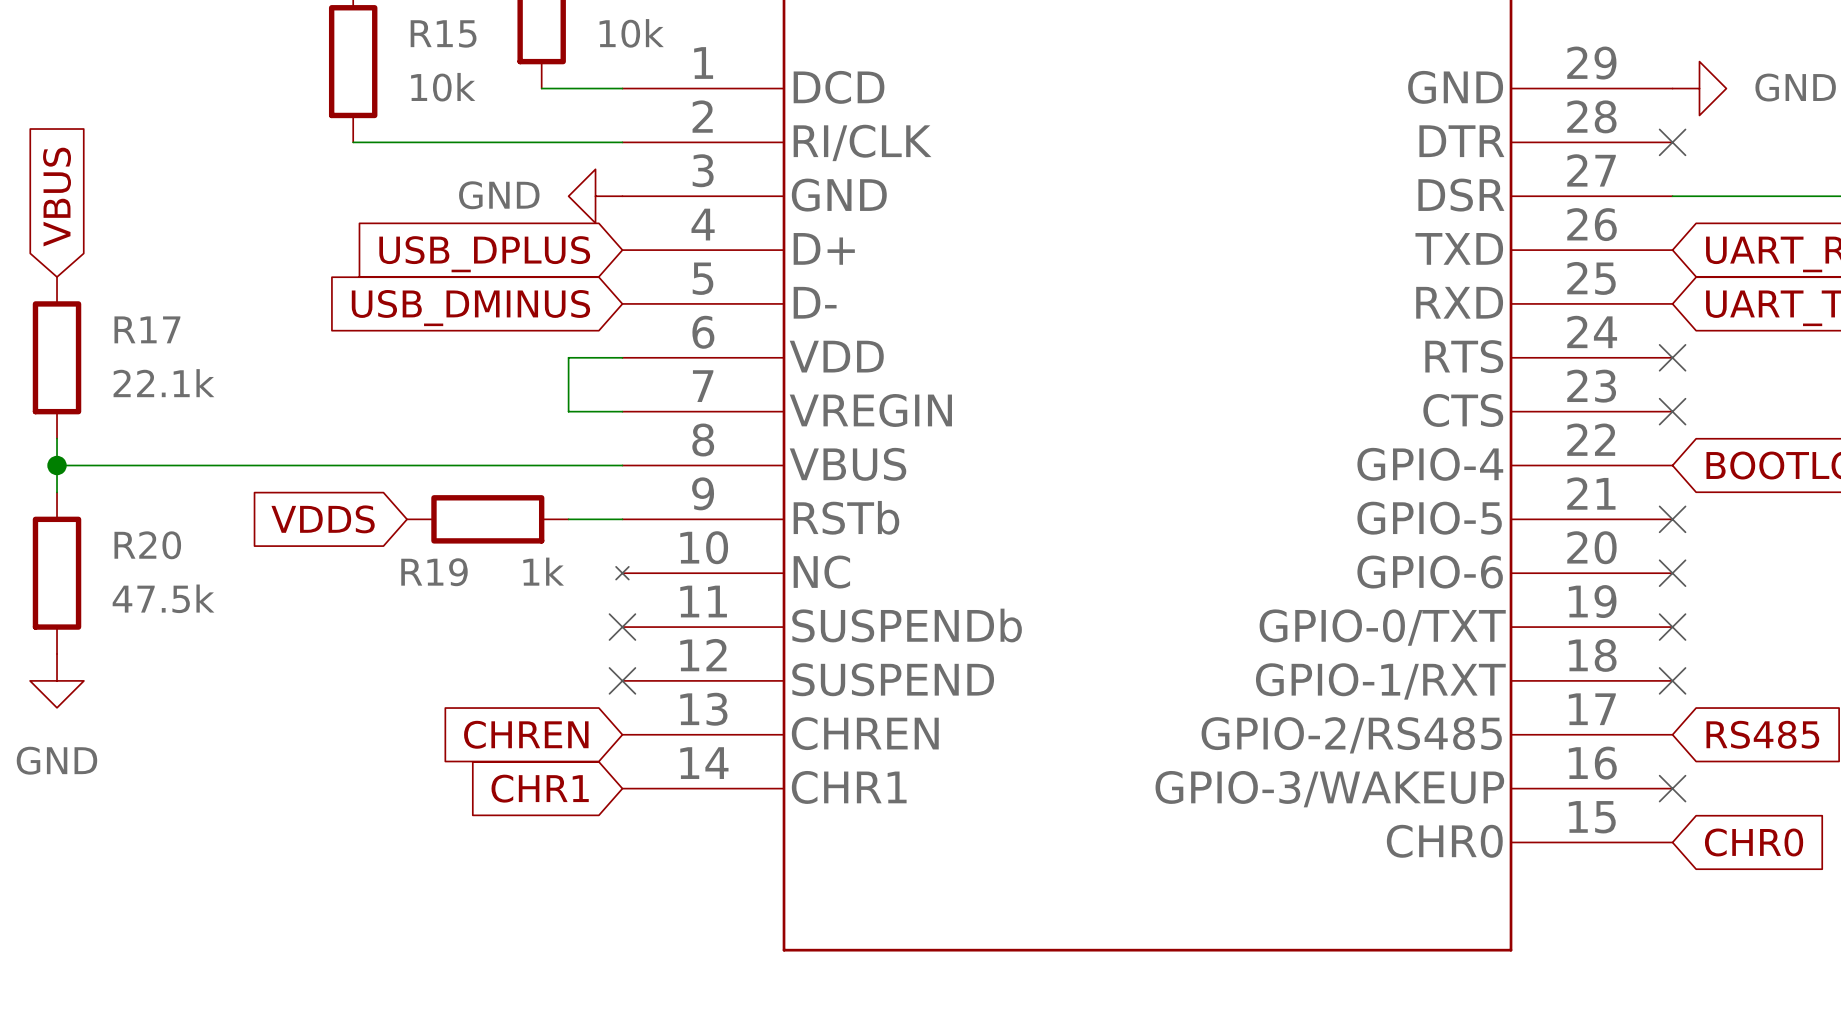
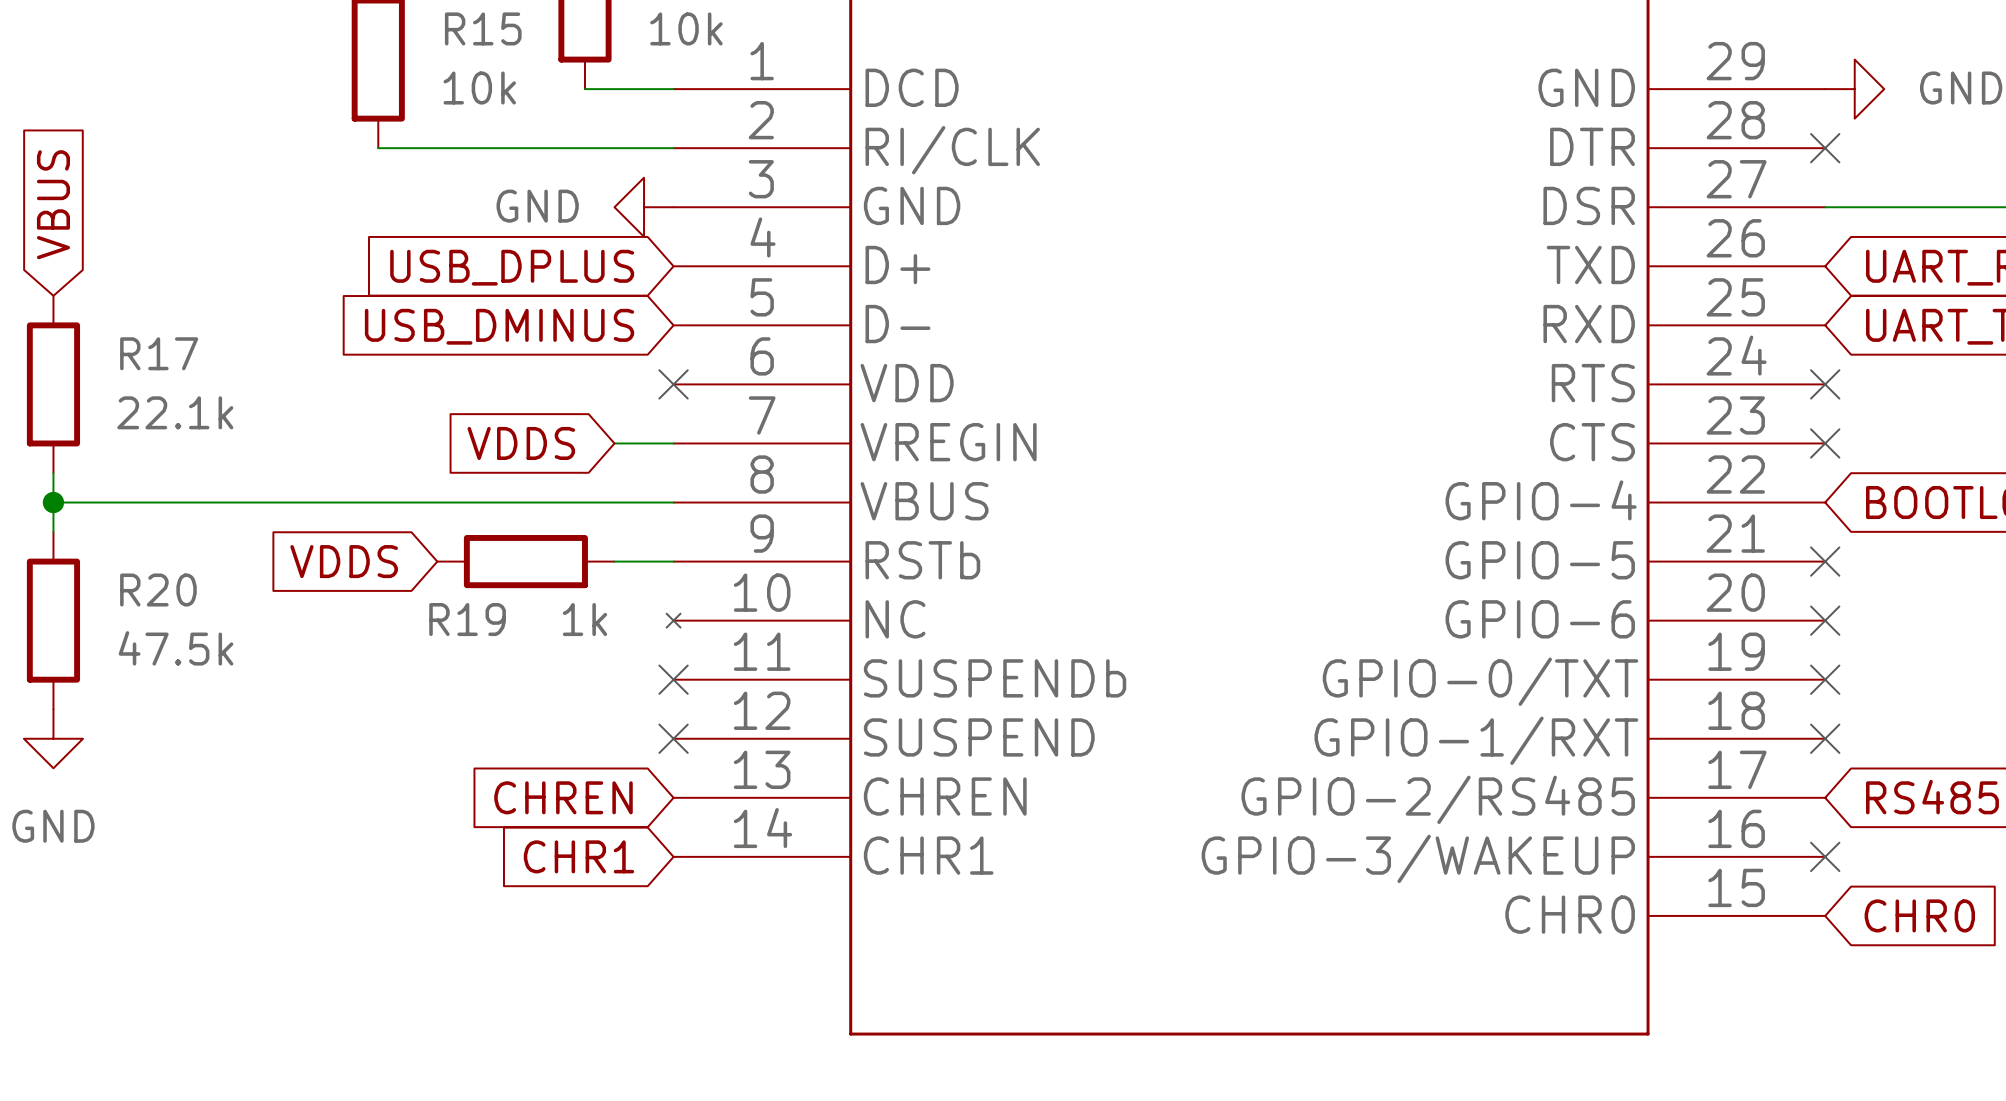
wire: (622, 357) (568, 357) (568, 411) -> none
no-connect mark: none -> (673, 384)
global label: none -> VDDS (521, 443)

